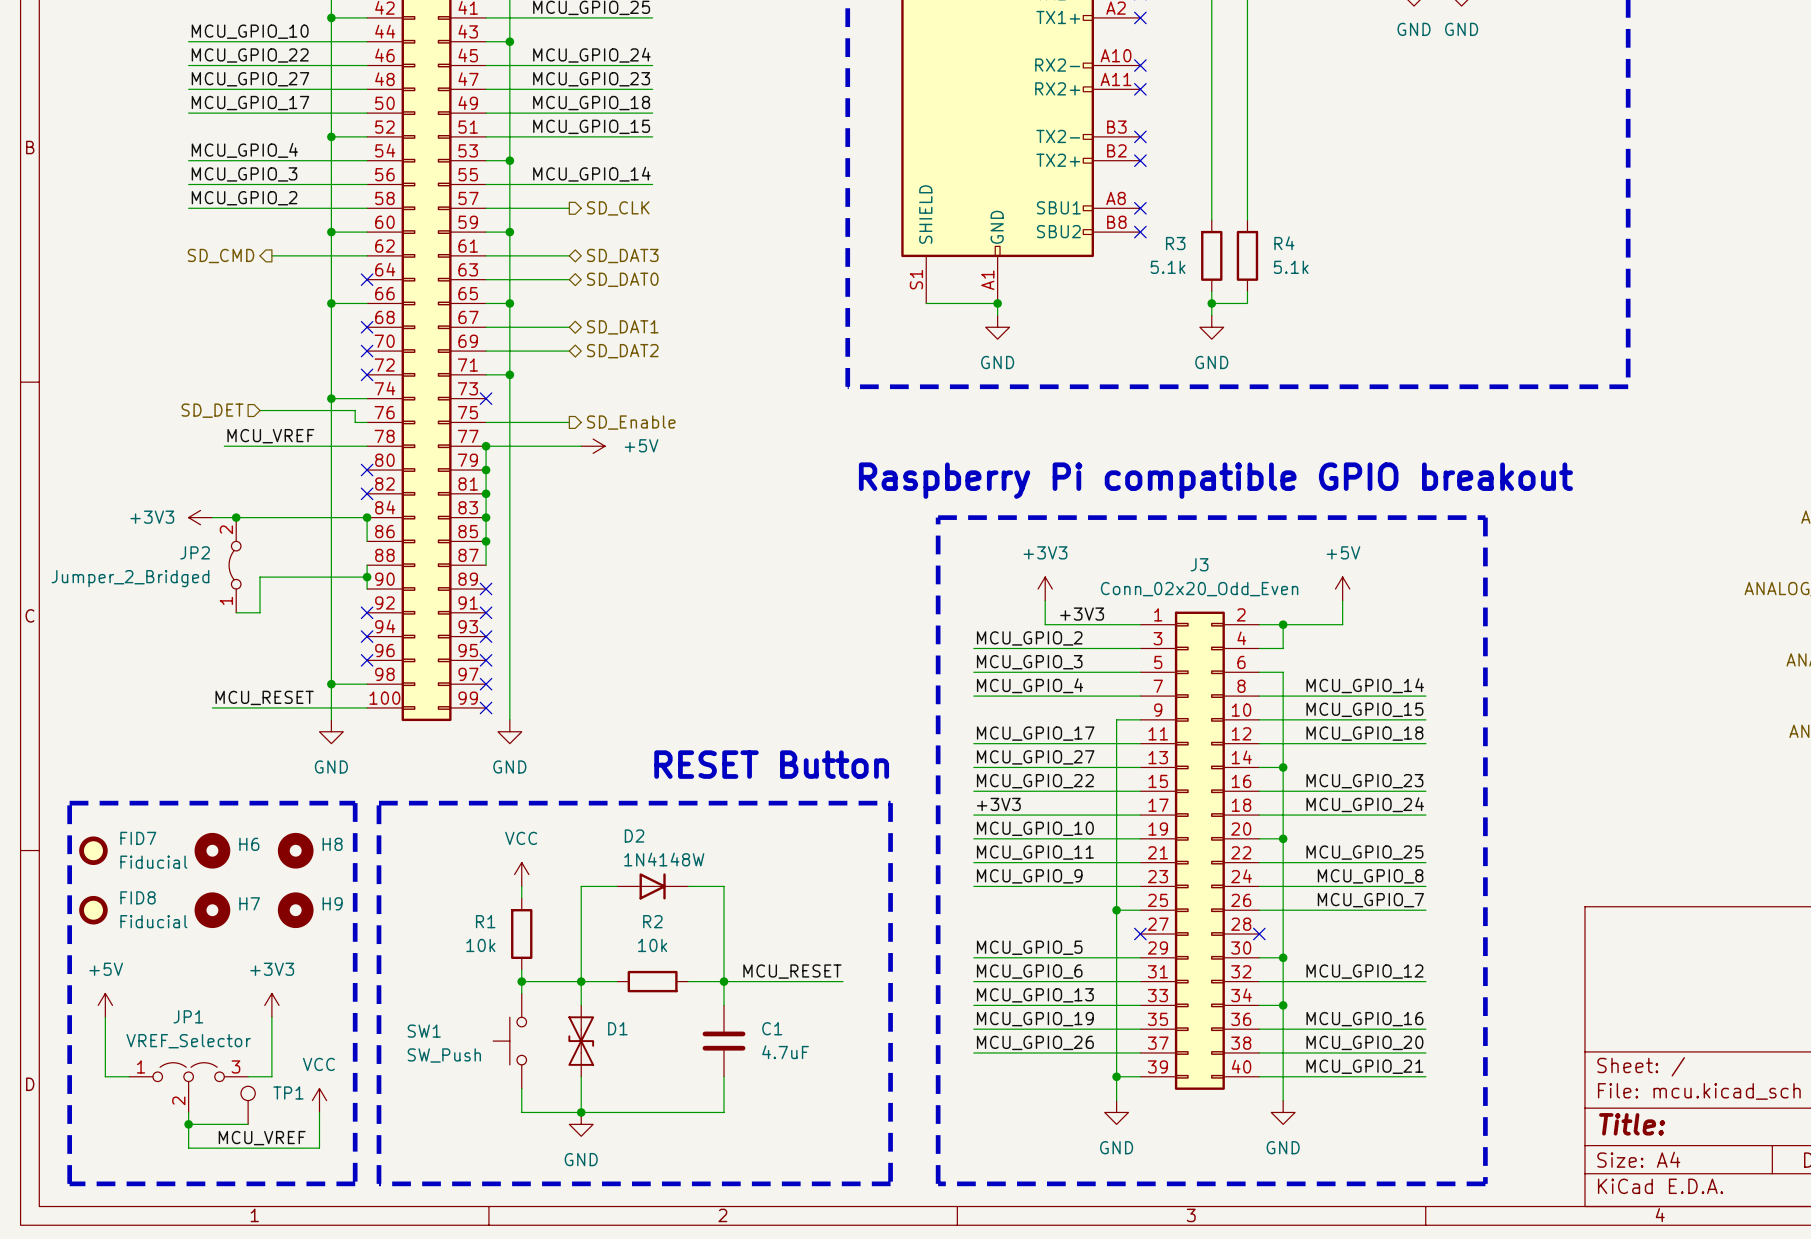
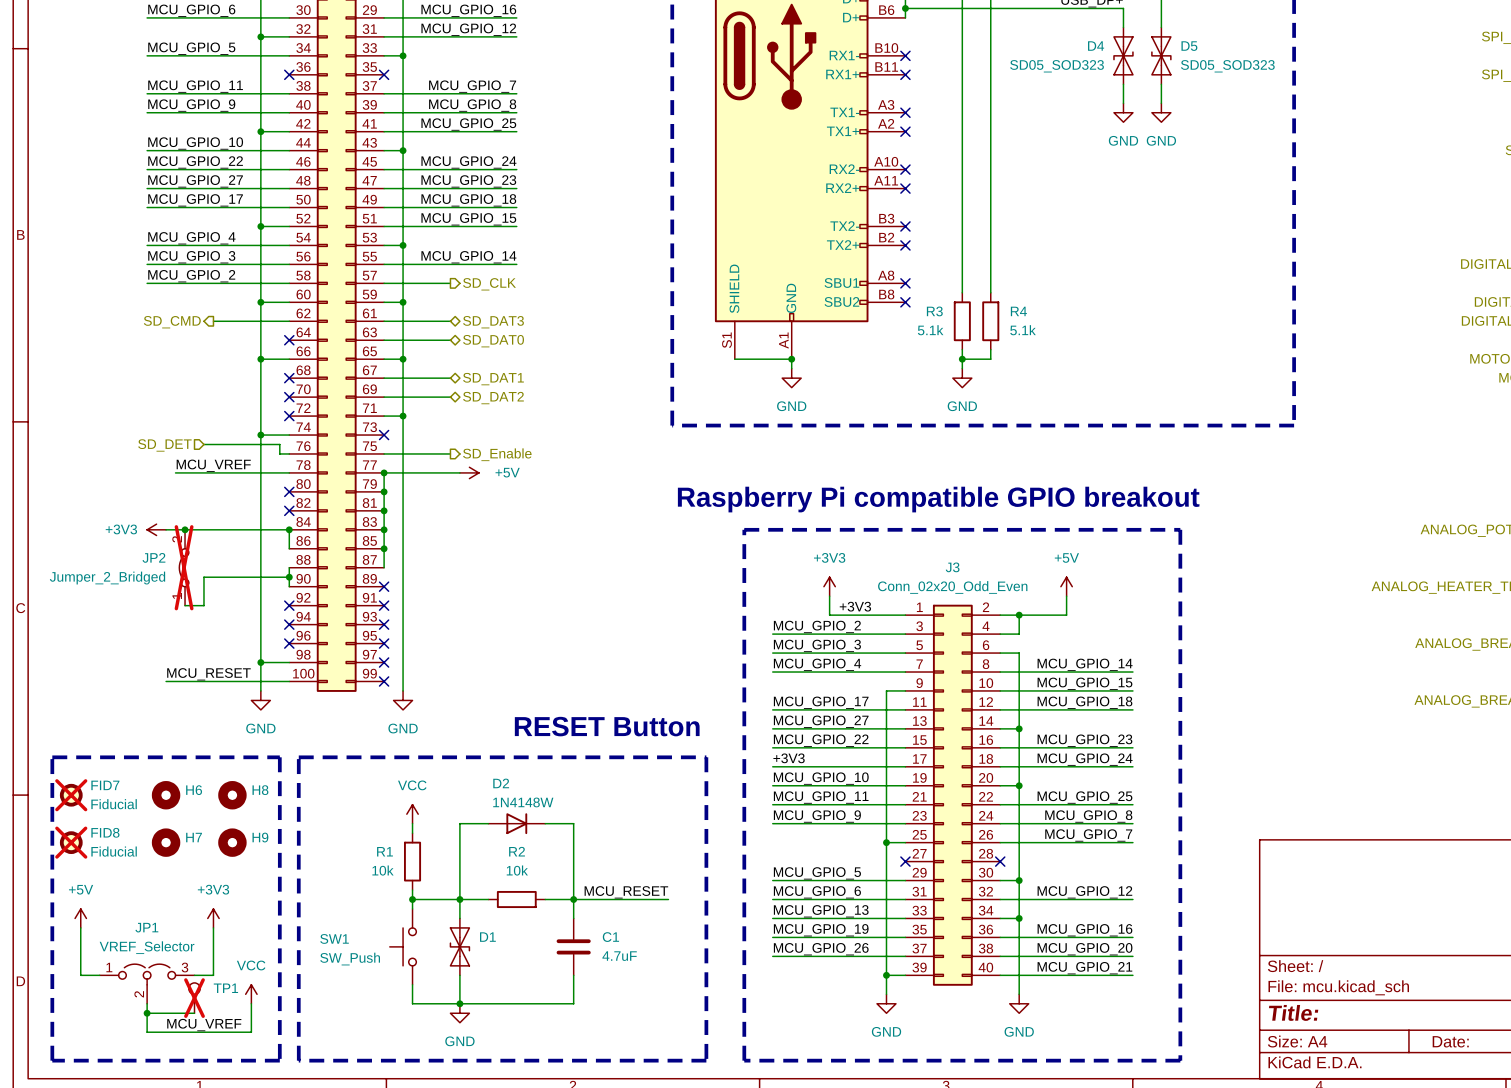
JP2 do-not-place cross: none -> (184, 567)
FID7 do-not-place cross: none -> (71, 795)
FID8 do-not-place cross: none -> (71, 842)
TP1 do-not-place cross: none -> (194, 998)

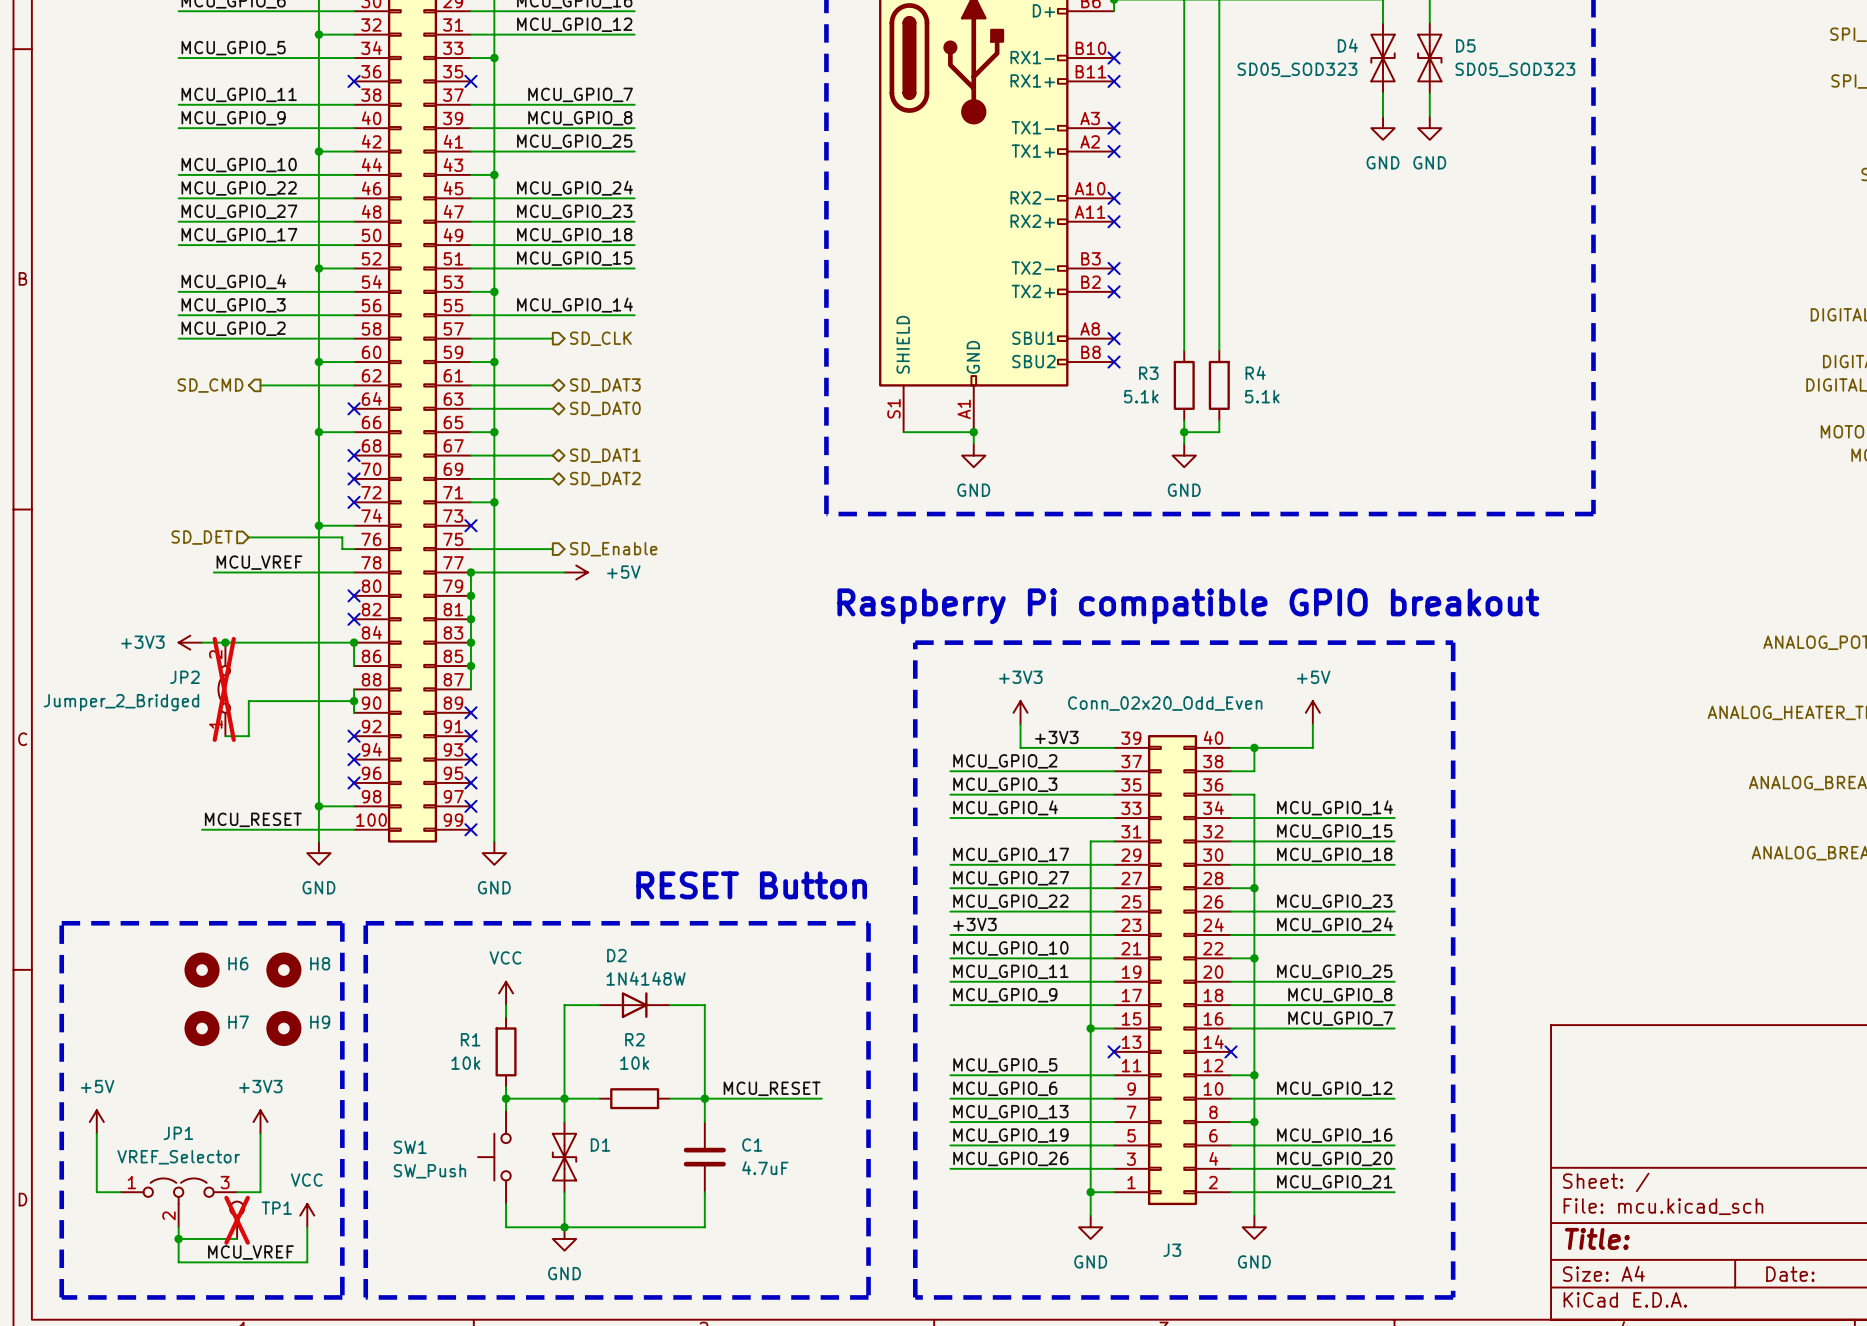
FID7: Fiducial (71, 795) -> none
J3 flip: as is (952, 795) -> up-down (1172, 970)
FID8: Fiducial (71, 842) -> none

